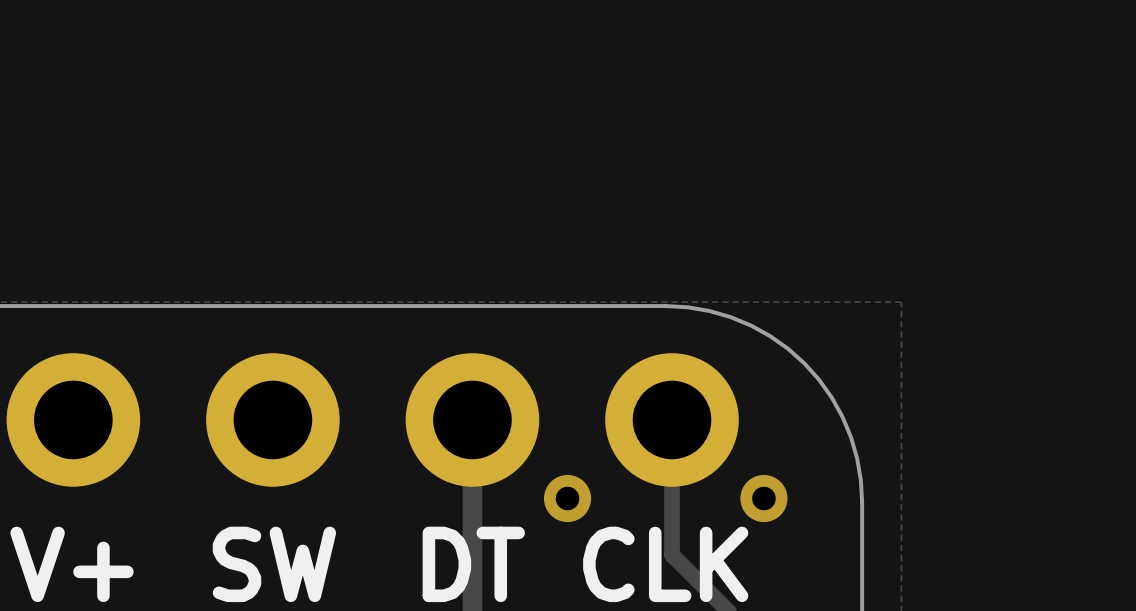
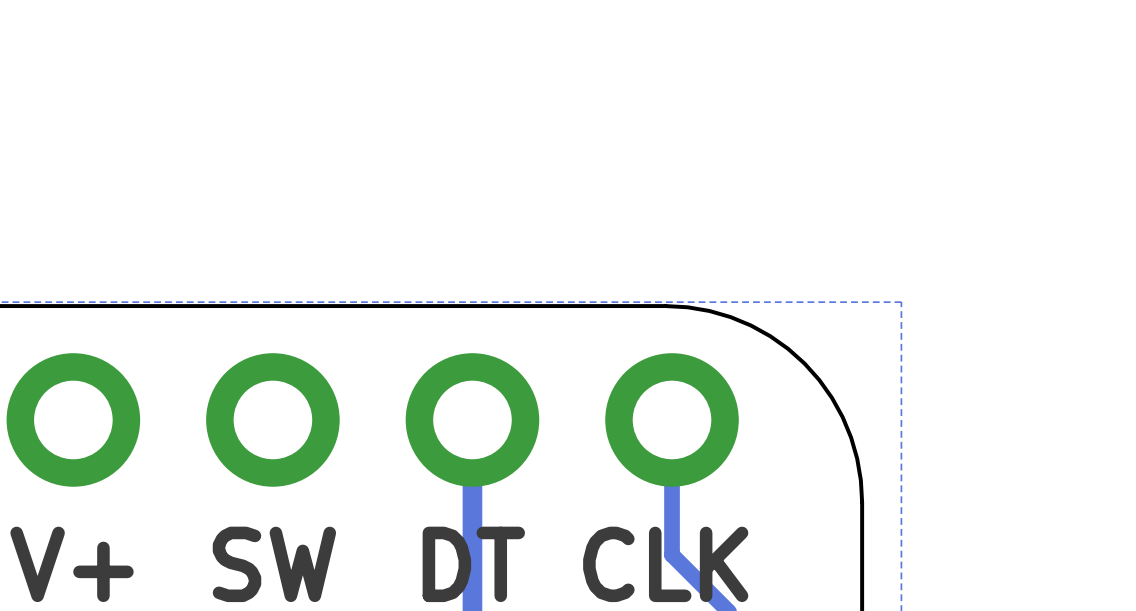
via: (567, 498) -> none
via: (763, 498) -> none

